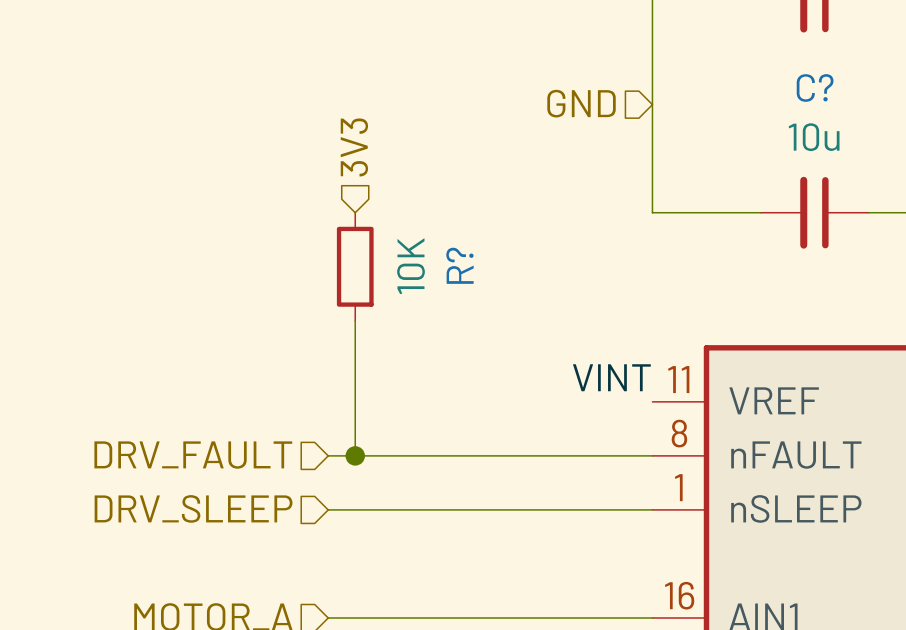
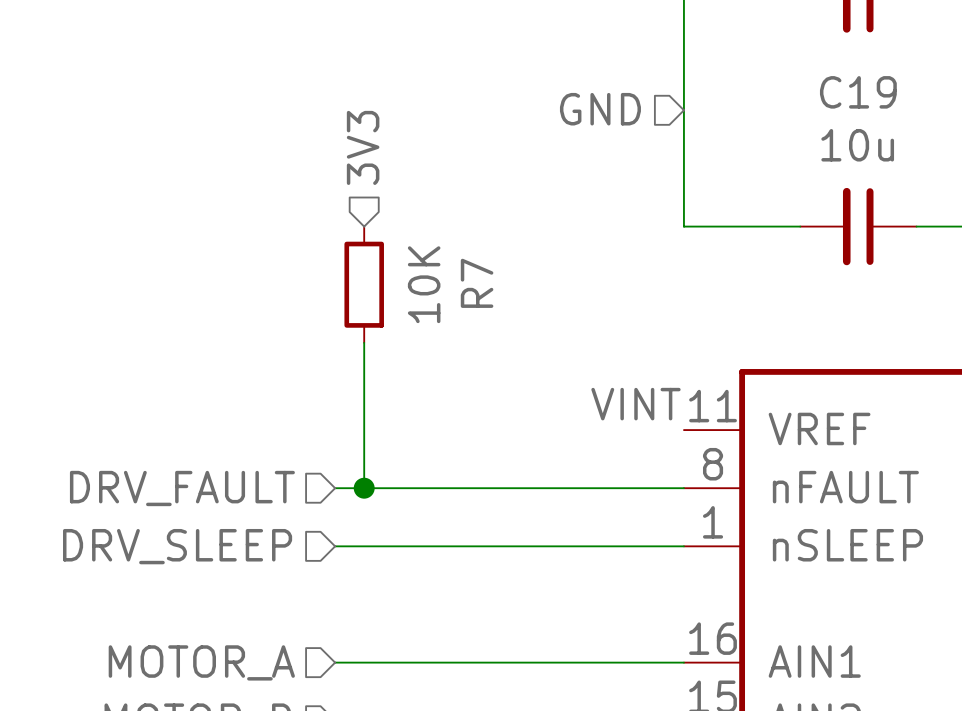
C? name: C? (815, 87) -> C19 (858, 92)
R? name: R? (459, 265) -> R7 (477, 283)

